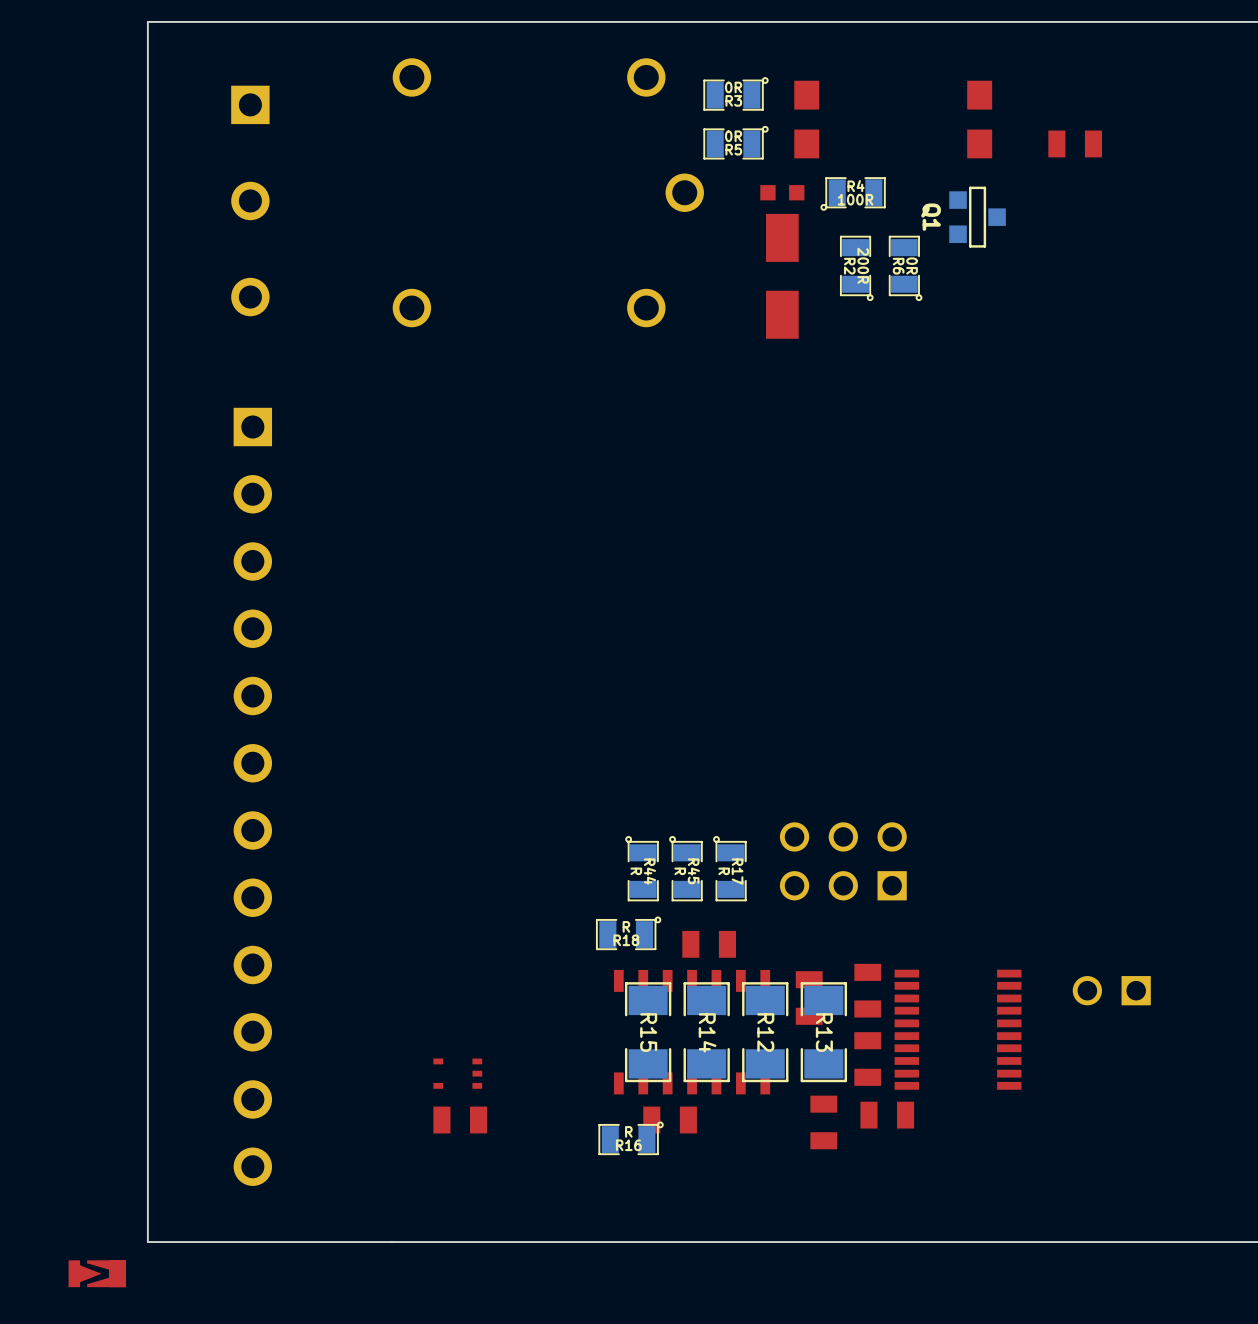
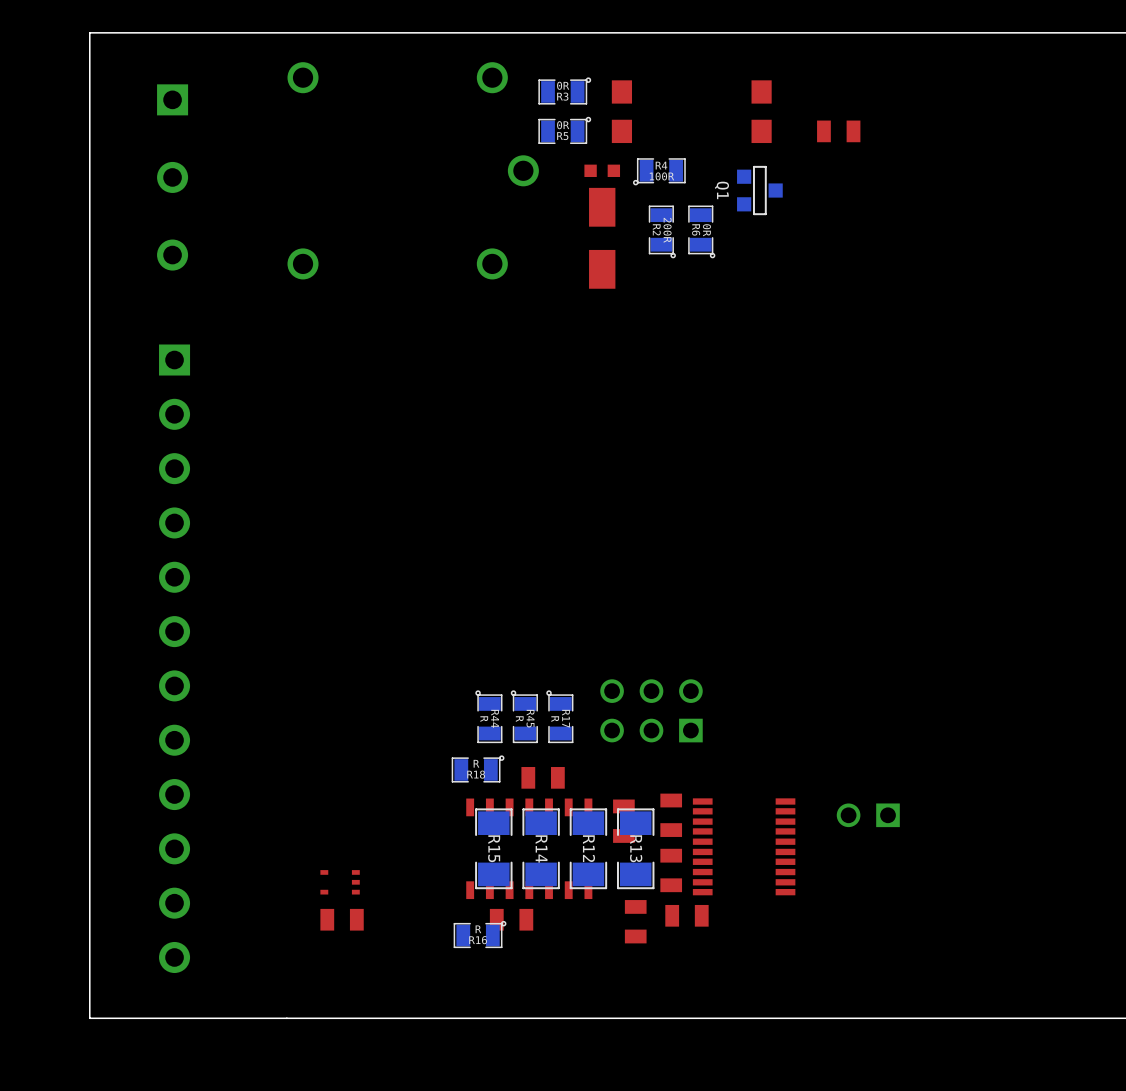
part: (97, 1273) -> none

